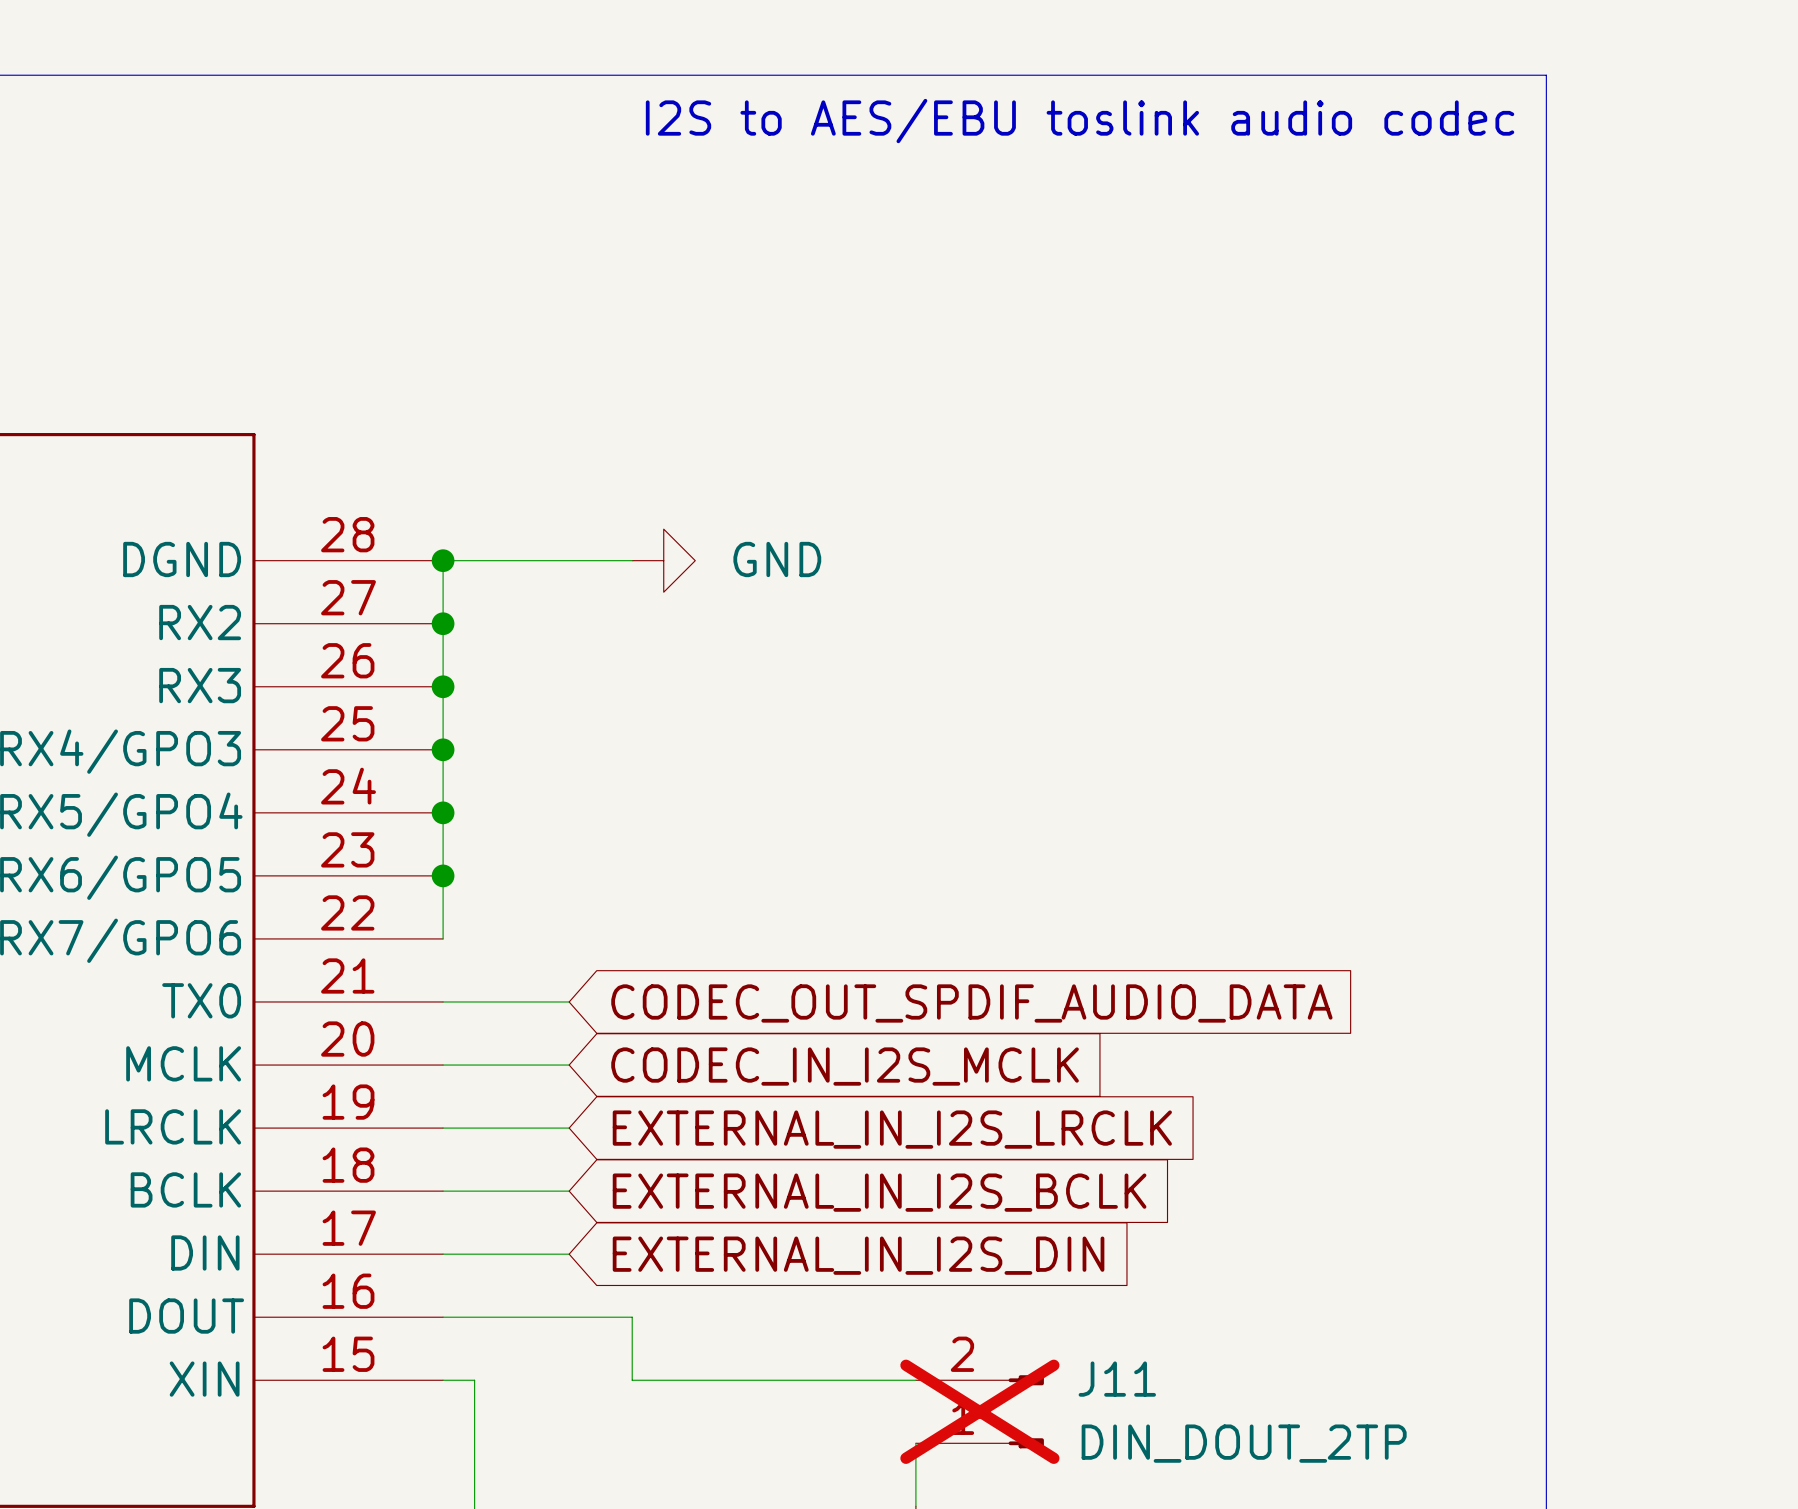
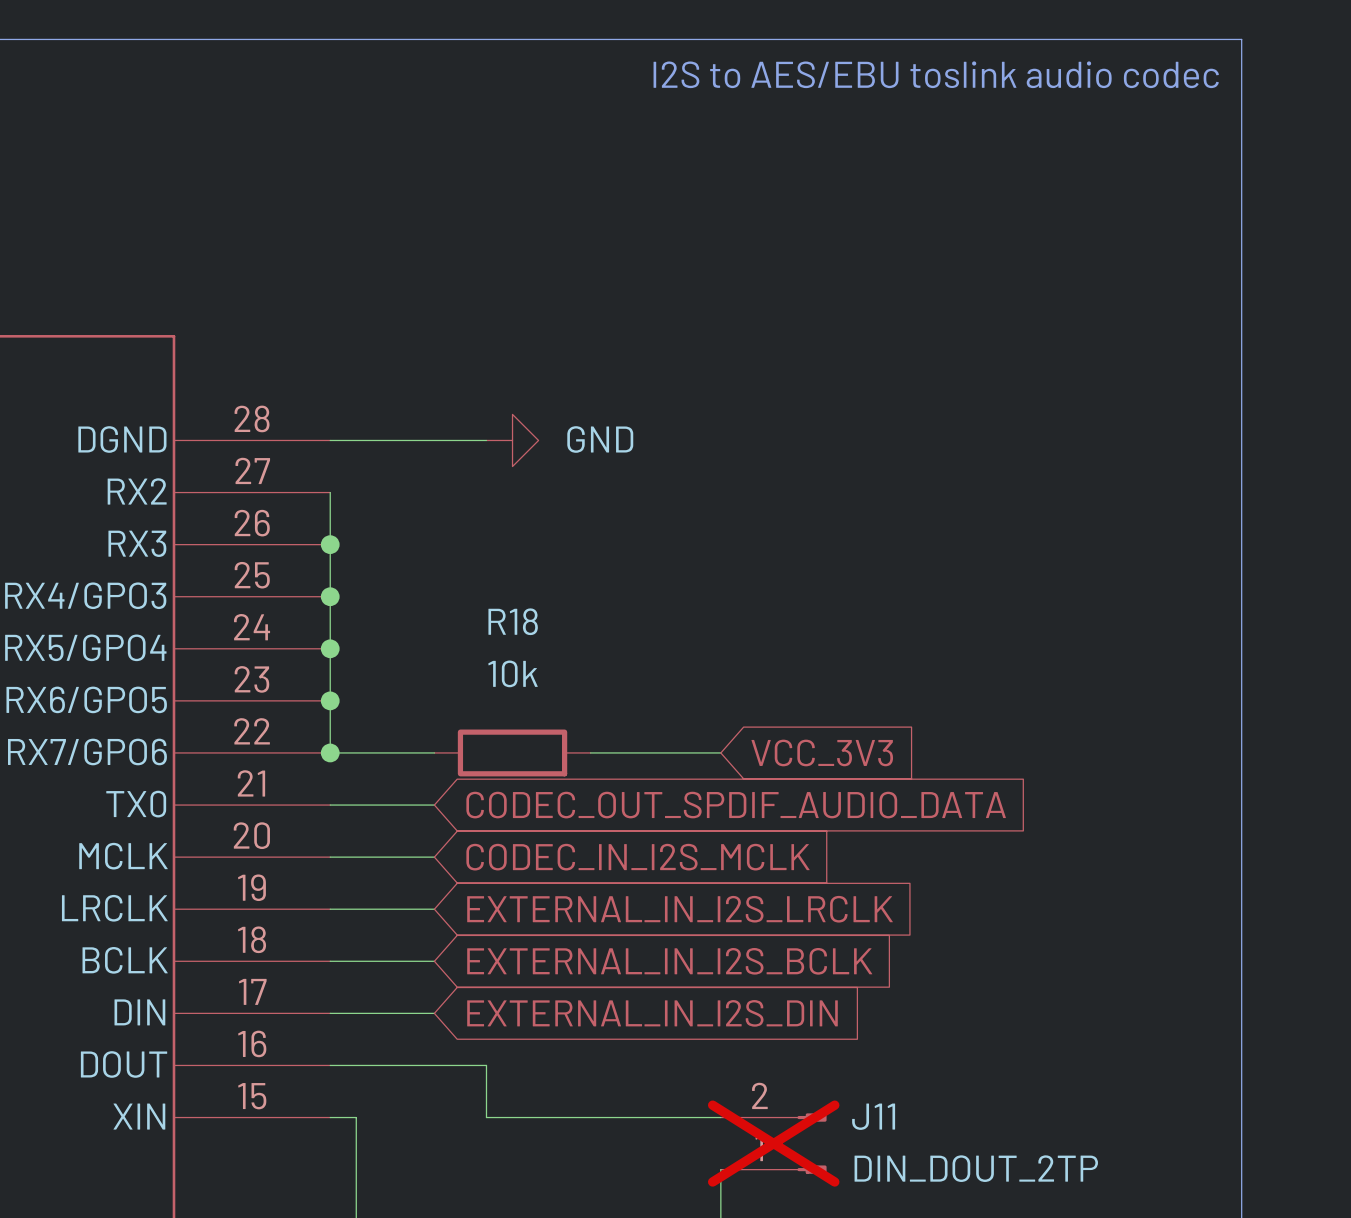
wire: (443, 560) (443, 623) -> none
junction: (443, 560) -> none
junction: (443, 623) -> none
wire: none -> (330, 752) (434, 752)
junction: none -> (330, 752)
R18: none -> 10k (512, 752)
wire: none -> (590, 752) (720, 752)
global label: none -> VCC_3V3 (822, 752)

